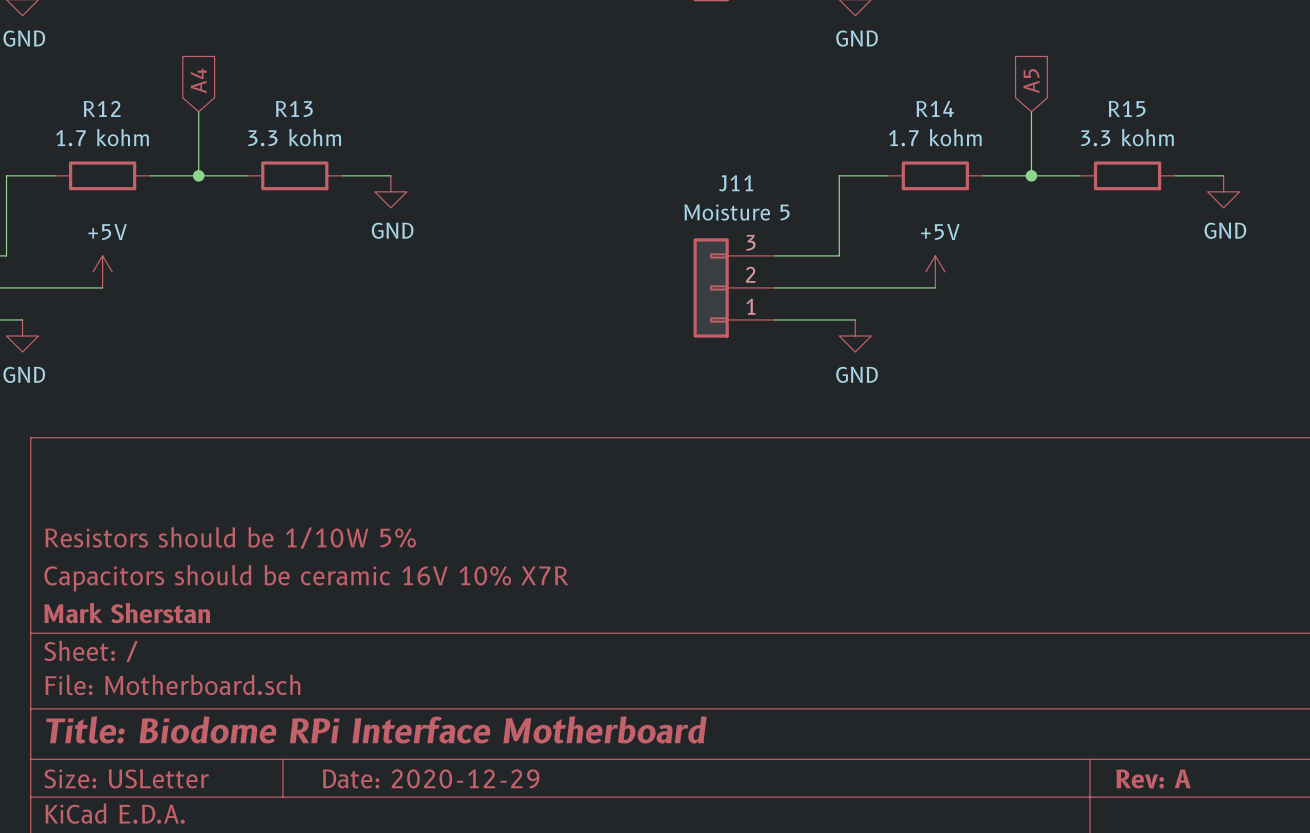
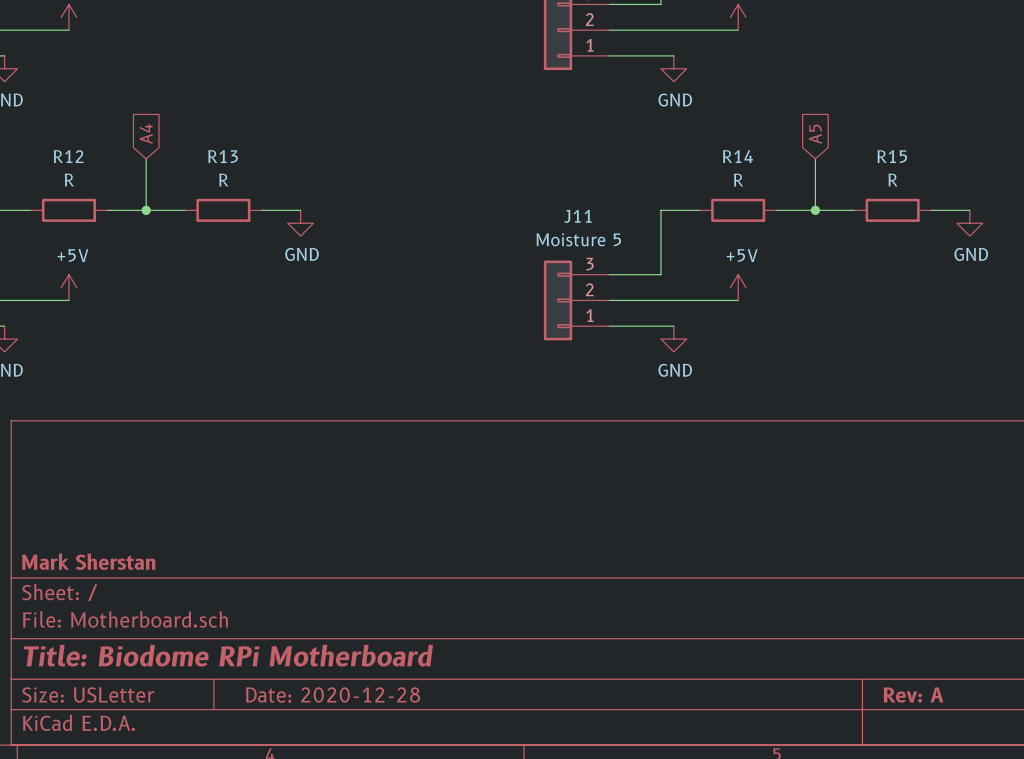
R12 value: 1.7 kohm (102, 137) -> R (69, 180)
R13 value: 3.3 kohm (294, 137) -> R (223, 180)
R14 value: 1.7 kohm (935, 137) -> R (738, 180)
R15 value: 3.3 kohm (1127, 137) -> R (892, 180)
title block: Resistors should be 1/10W 5% (230, 537) -> none
title block: Capacitors should be ceramic 16V 10% X7R (306, 578) -> none
title block: Title: Biodome RPi Interface Motherboard (376, 729) -> Title: Biodome RPi Motherboard (228, 655)
title block: Date: 2020-12-29 (431, 778) -> Date: 2020-12-28 (333, 694)

